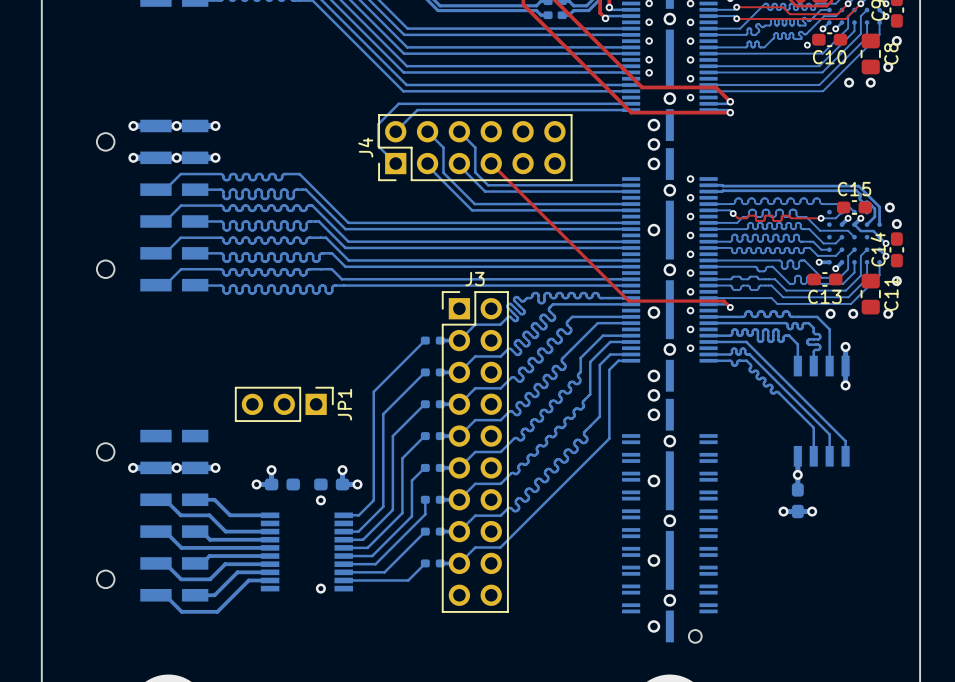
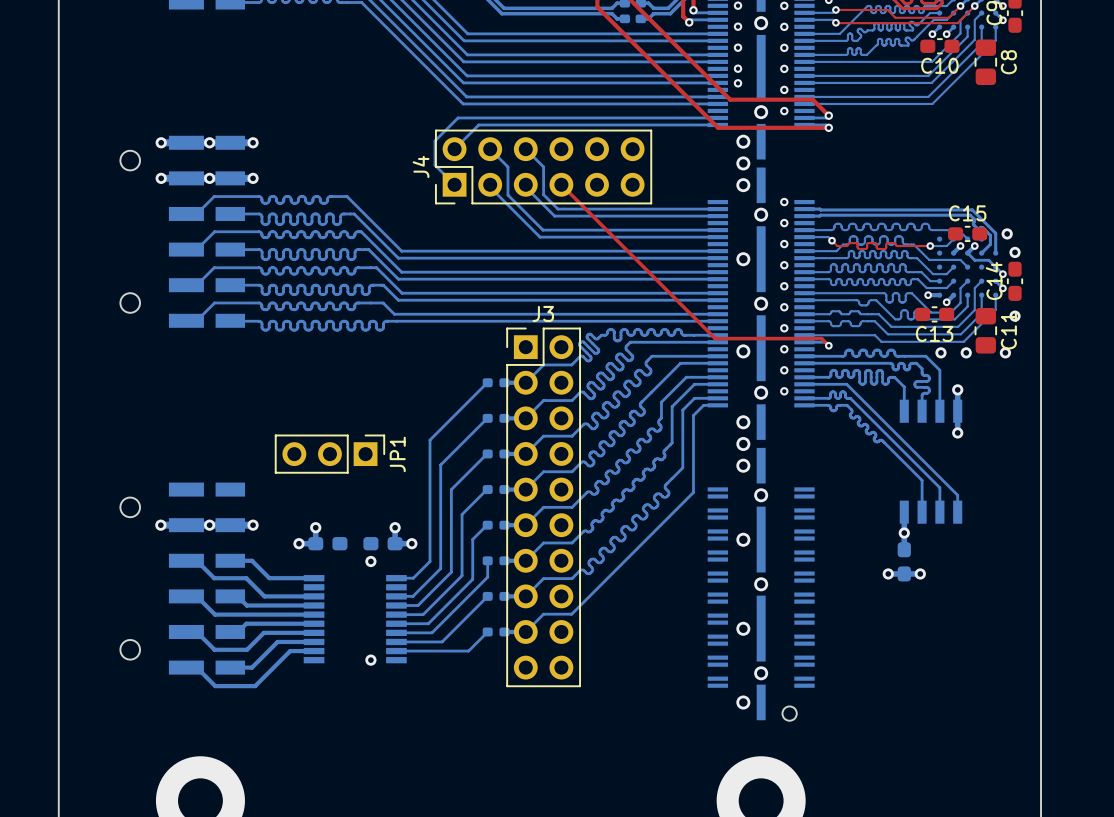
via: (896, 40) -> none
via: (807, 45) -> none
via: (888, 67) -> none
via: (849, 82) -> none
via: (870, 82) -> none

